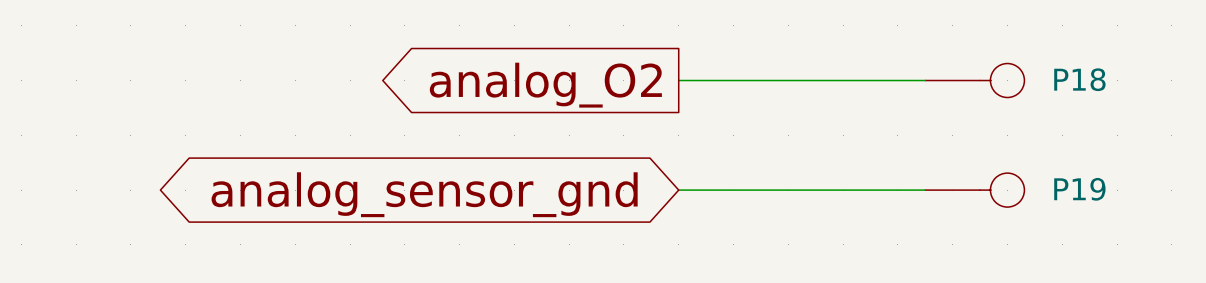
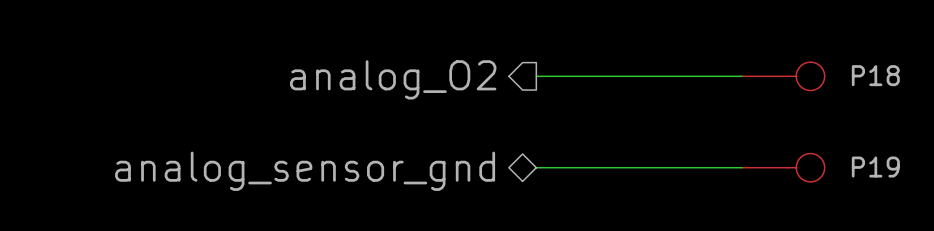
hierarchical label: none -> analog_O2 (393, 79)
global label: analog_O2 (545, 85) -> none
hierarchical label: none -> analog_sensor_gnd (305, 171)
global label: analog_sensor_gnd (424, 194) -> none

